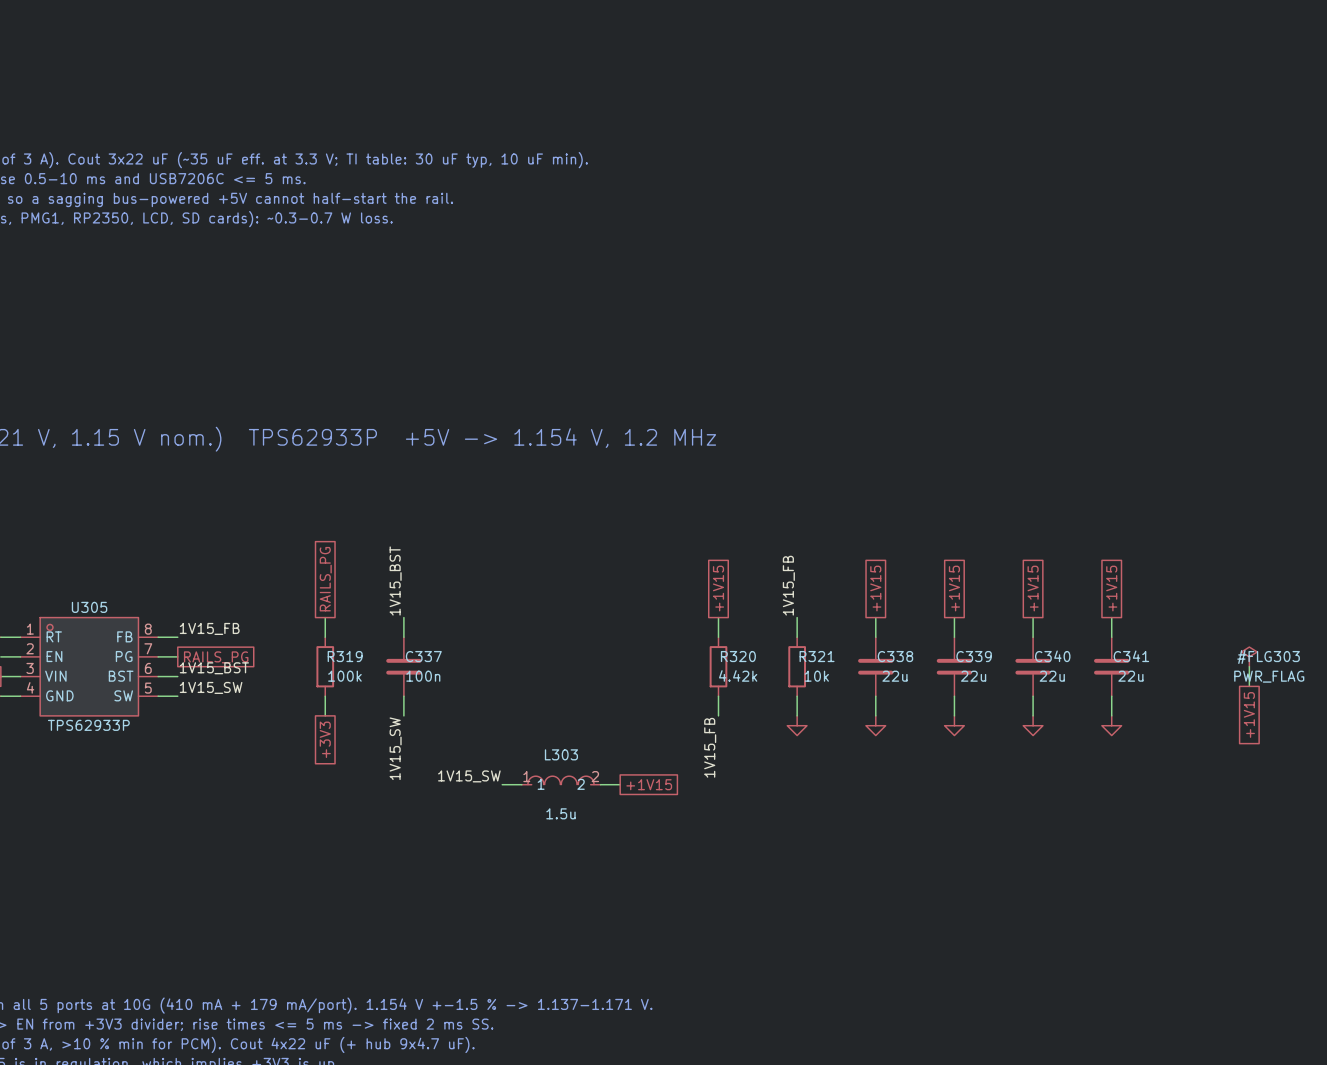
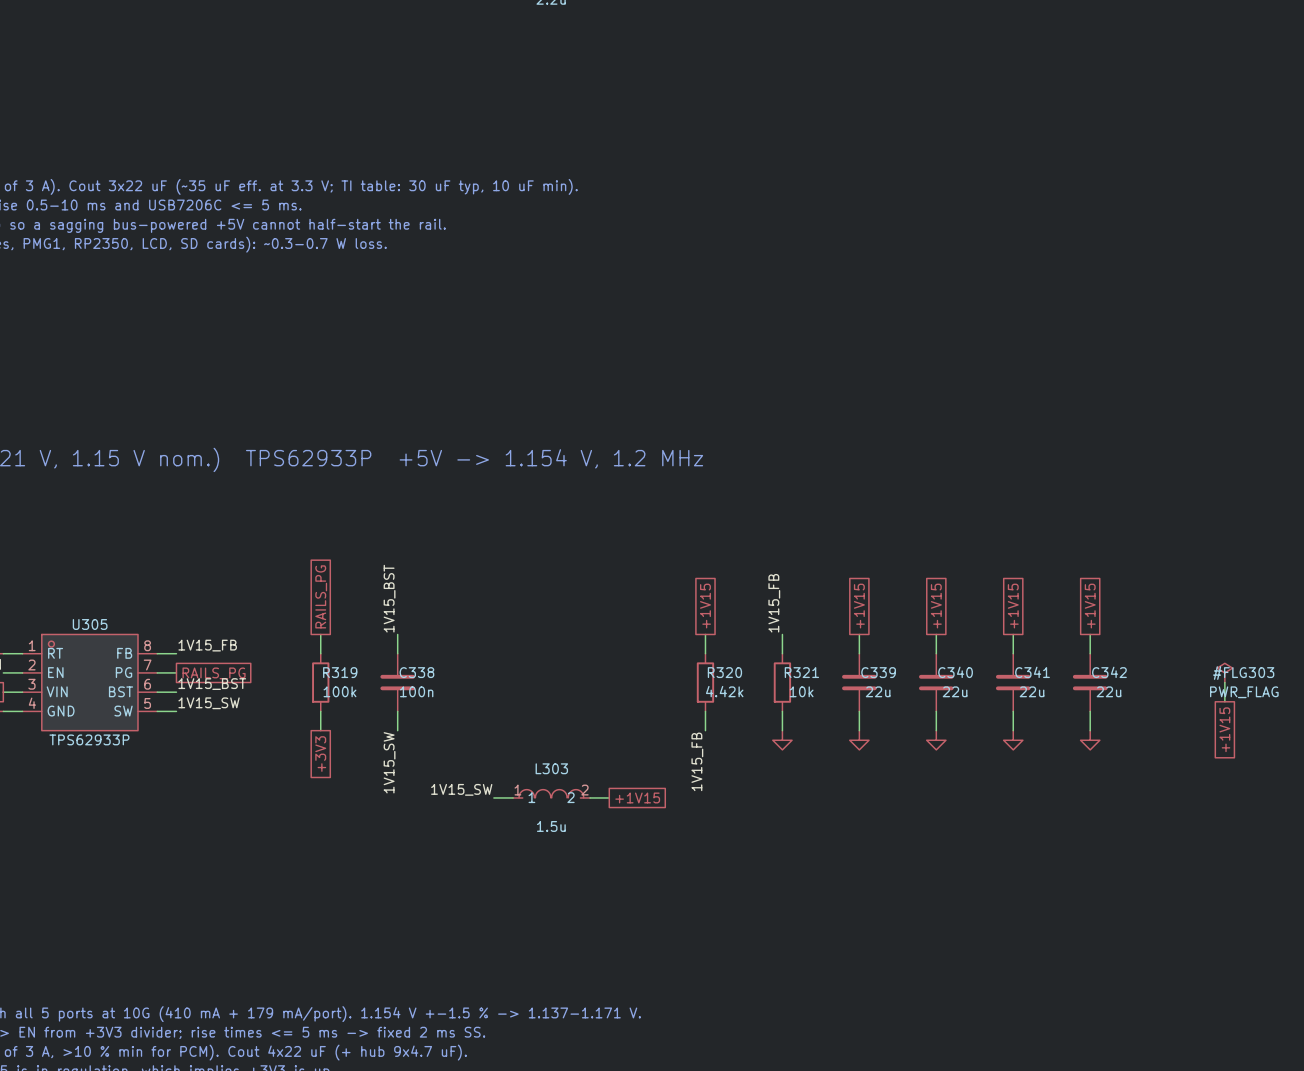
C337 name: C337 (423, 656) -> C338 (416, 672)
C338 name: C338 (895, 656) -> C339 (878, 672)
C339 name: C339 (974, 656) -> C340 (955, 672)
C340 name: C340 (1052, 656) -> C341 (1032, 672)
C341 name: C341 (1131, 656) -> C342 (1109, 672)

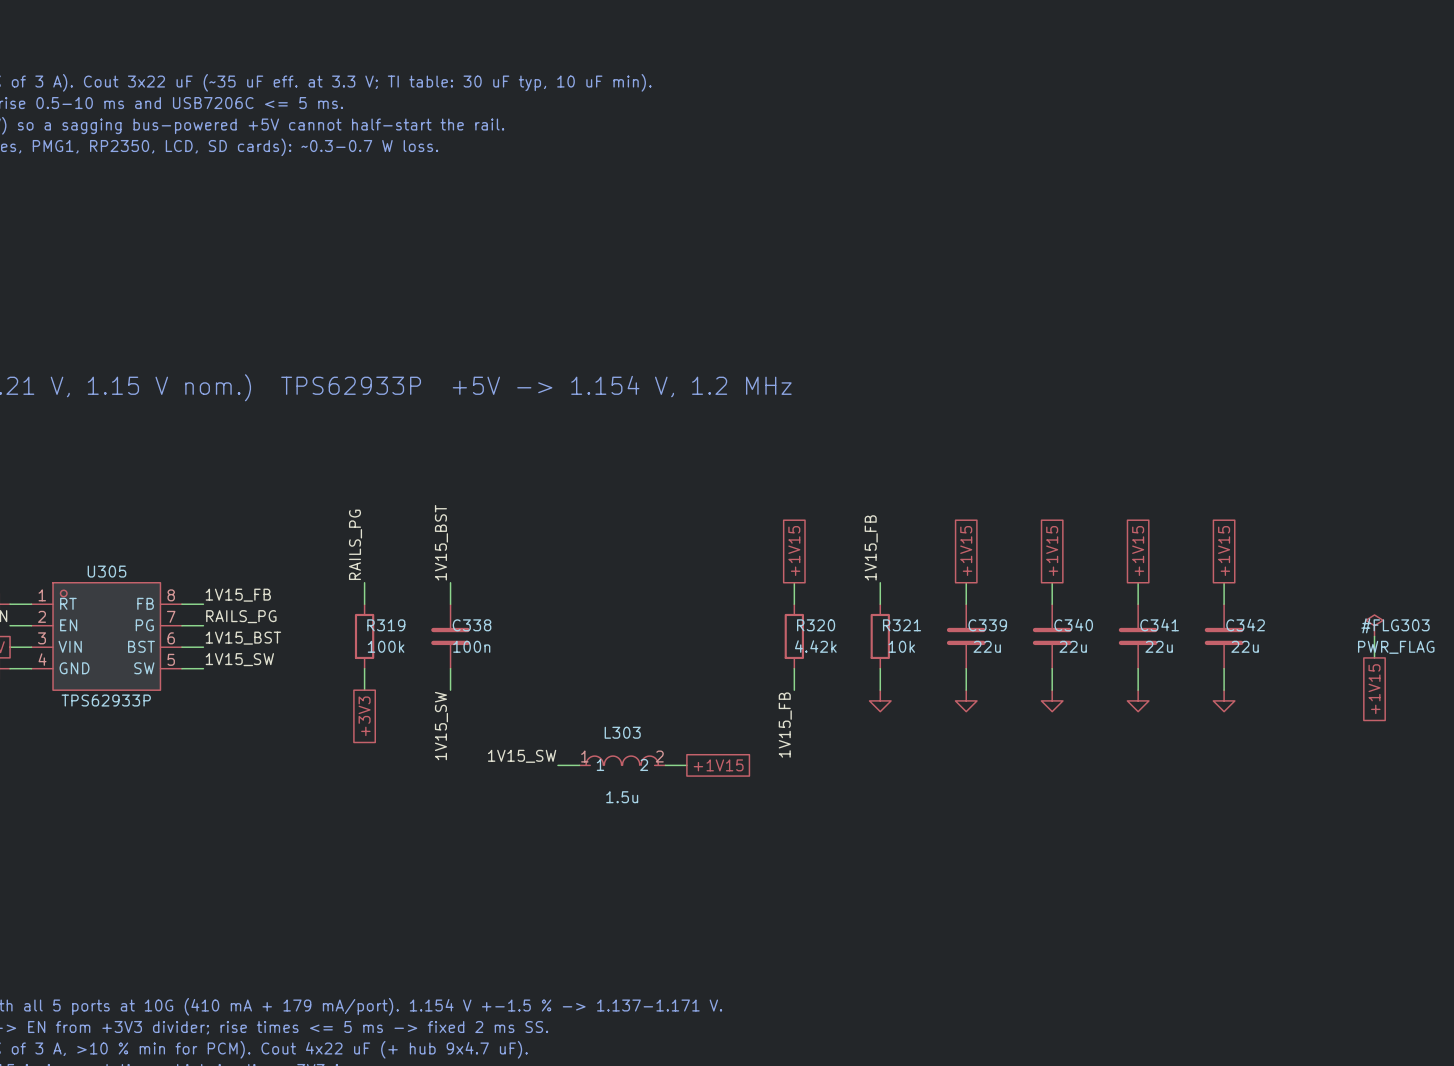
global label: RAILS_PG (321, 596) -> none
label: none -> RAILS_PG (355, 544)
label: none -> RAILS_PG (241, 616)
global label: RAILS_PG (214, 673) -> none

